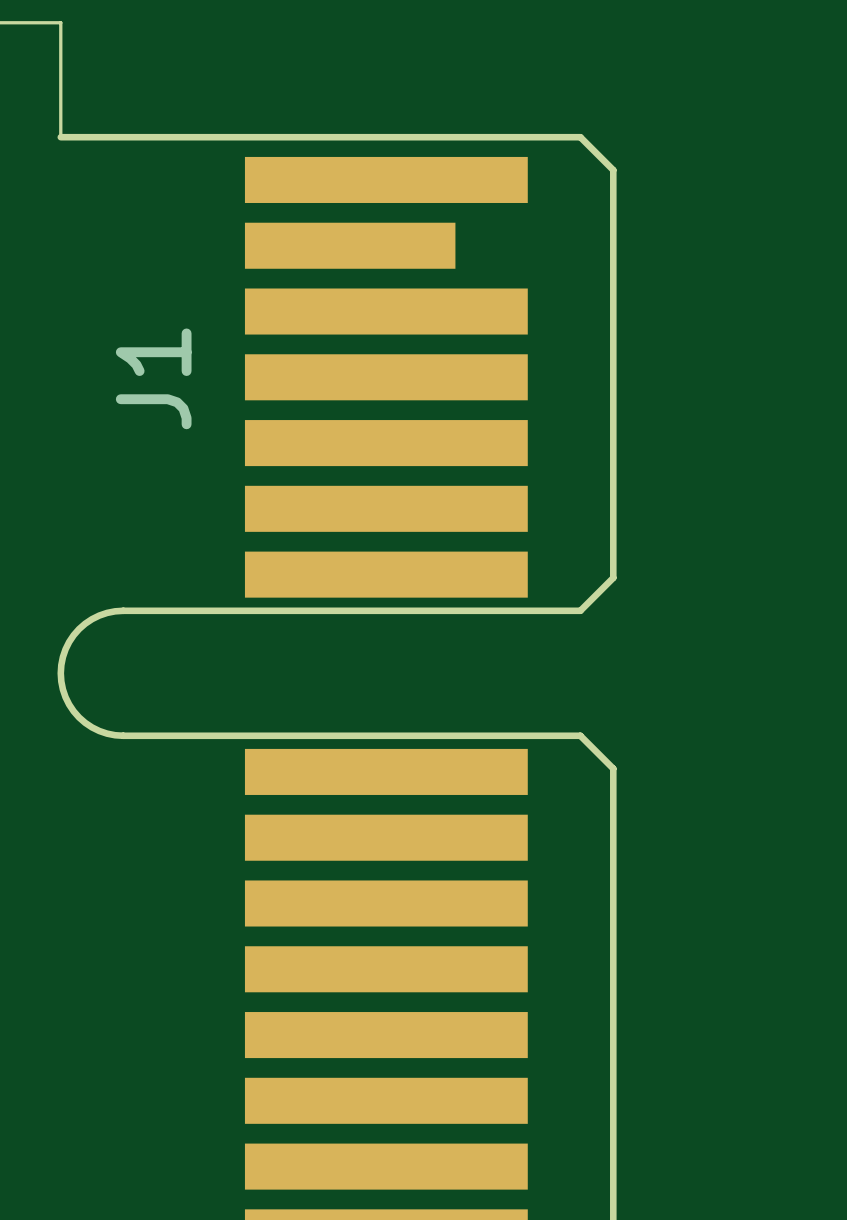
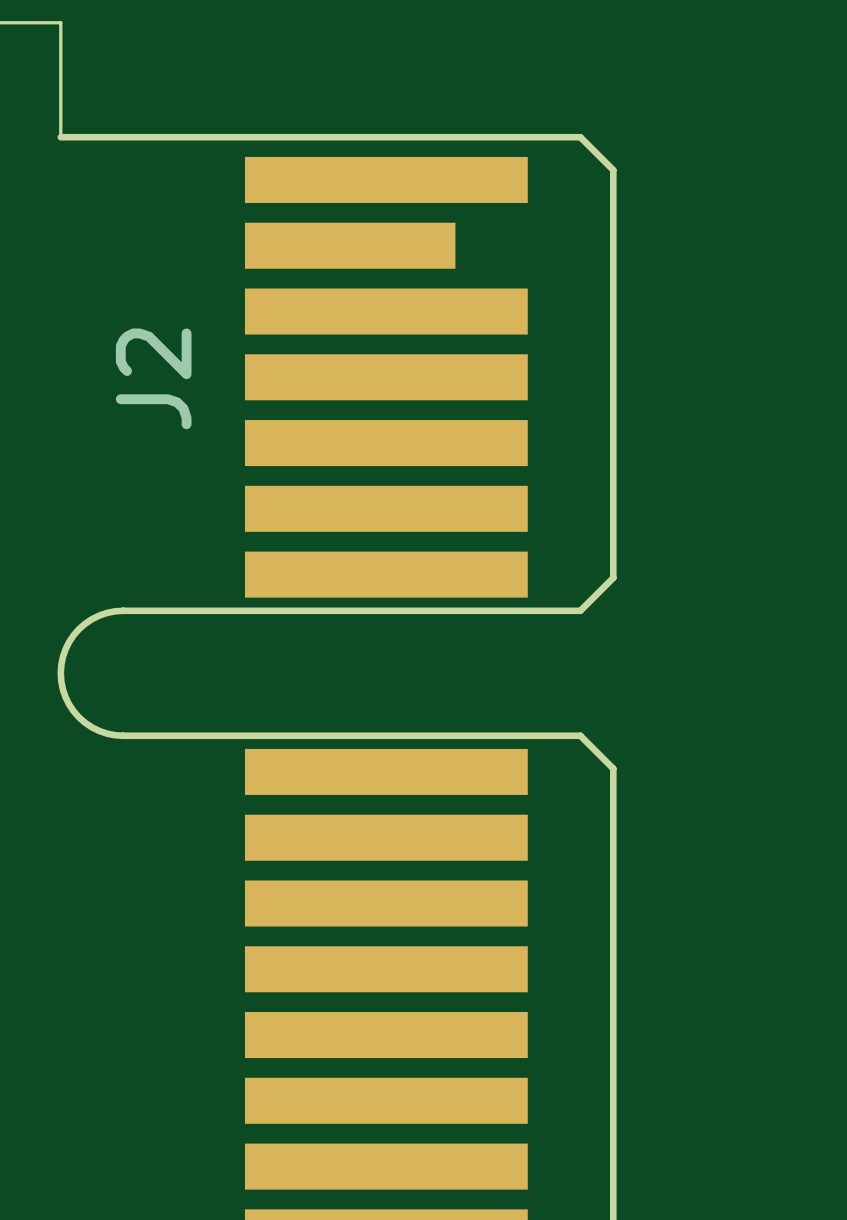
J1 name: J1 (153, 378) -> J2 (153, 378)

